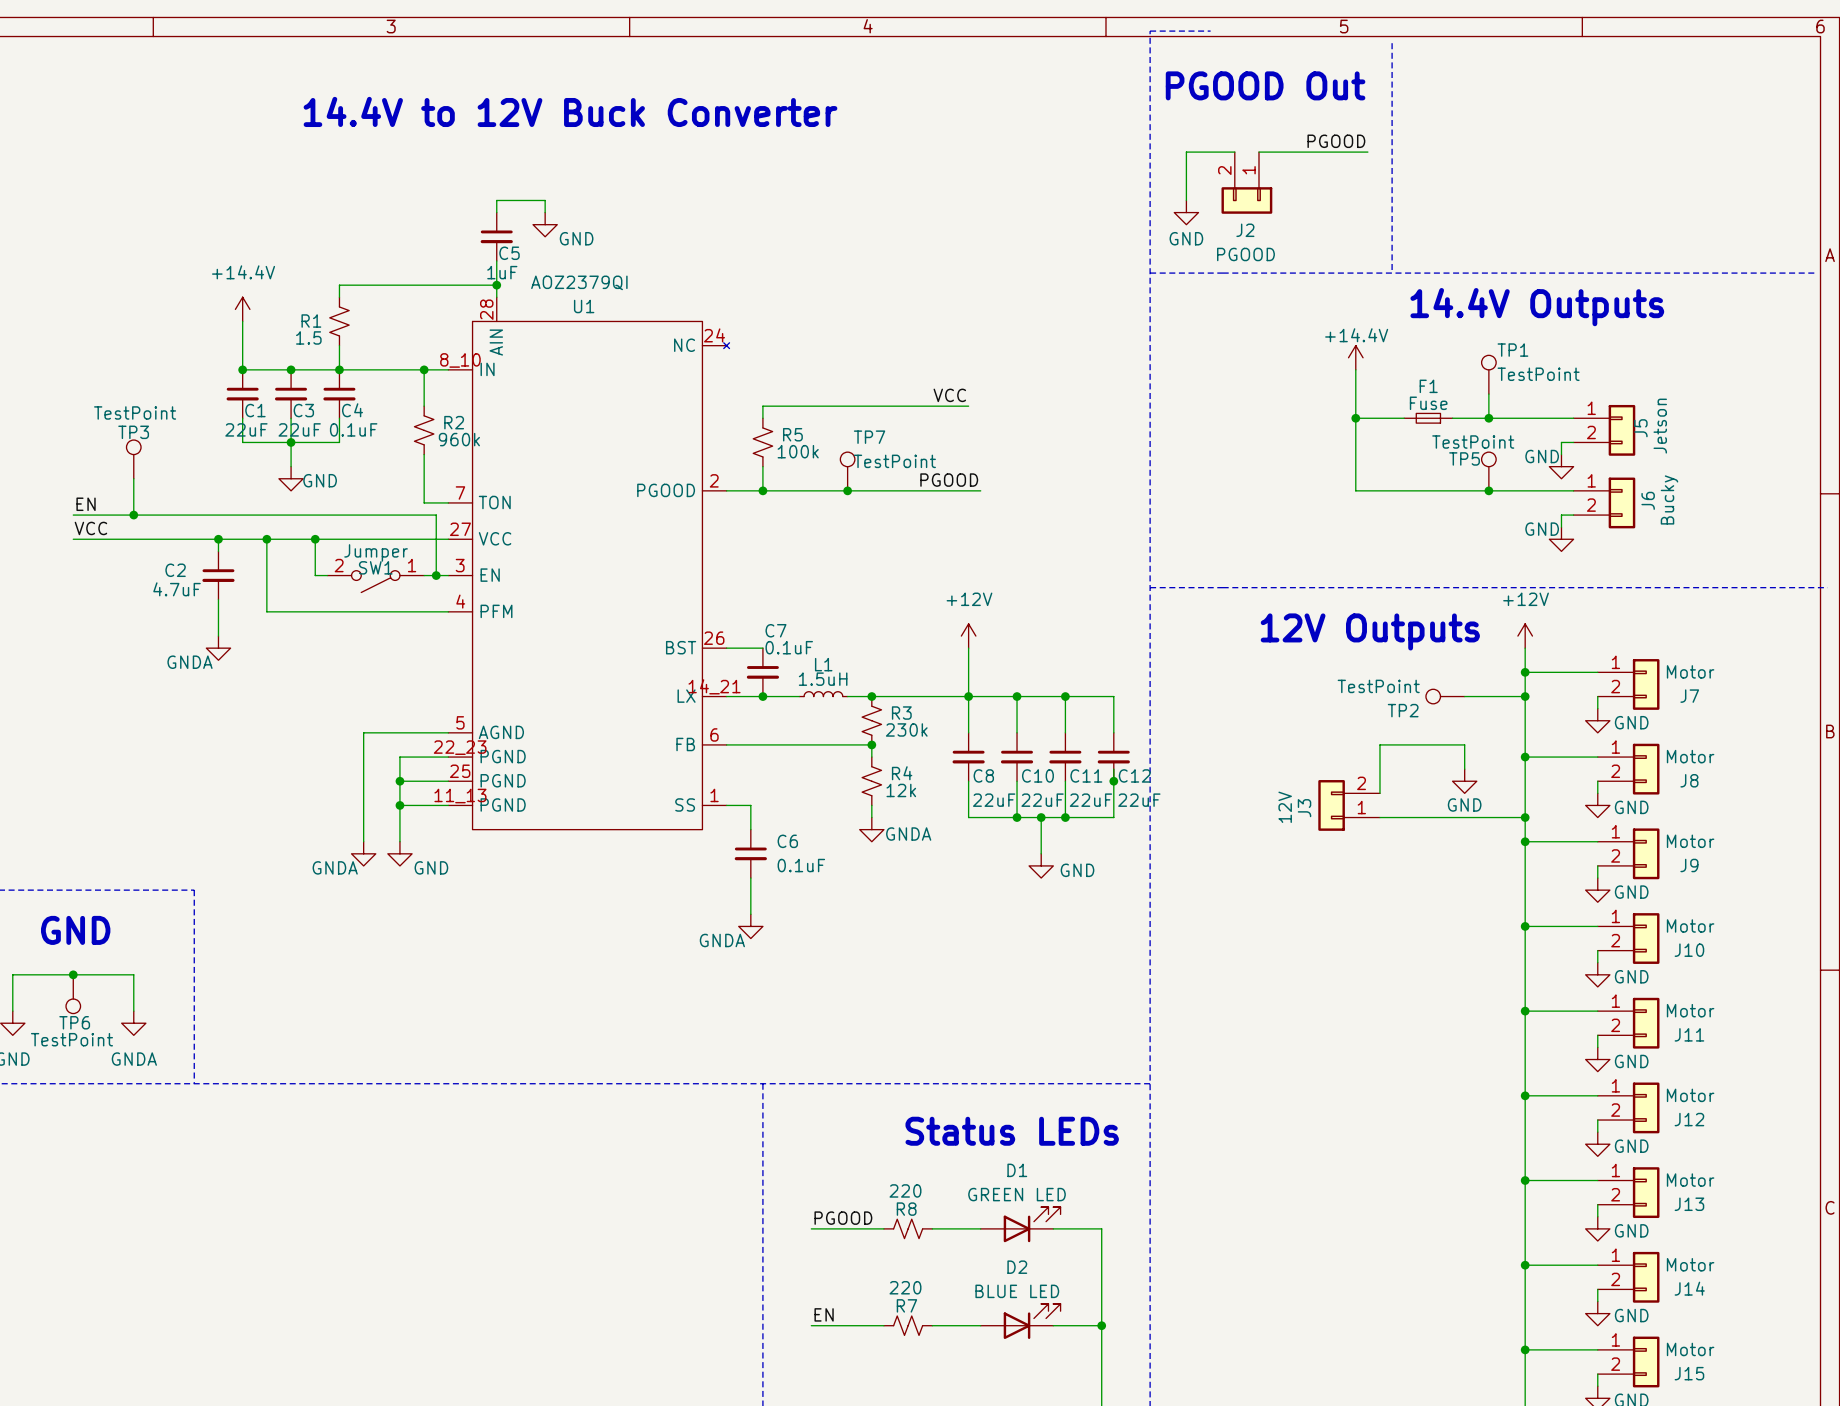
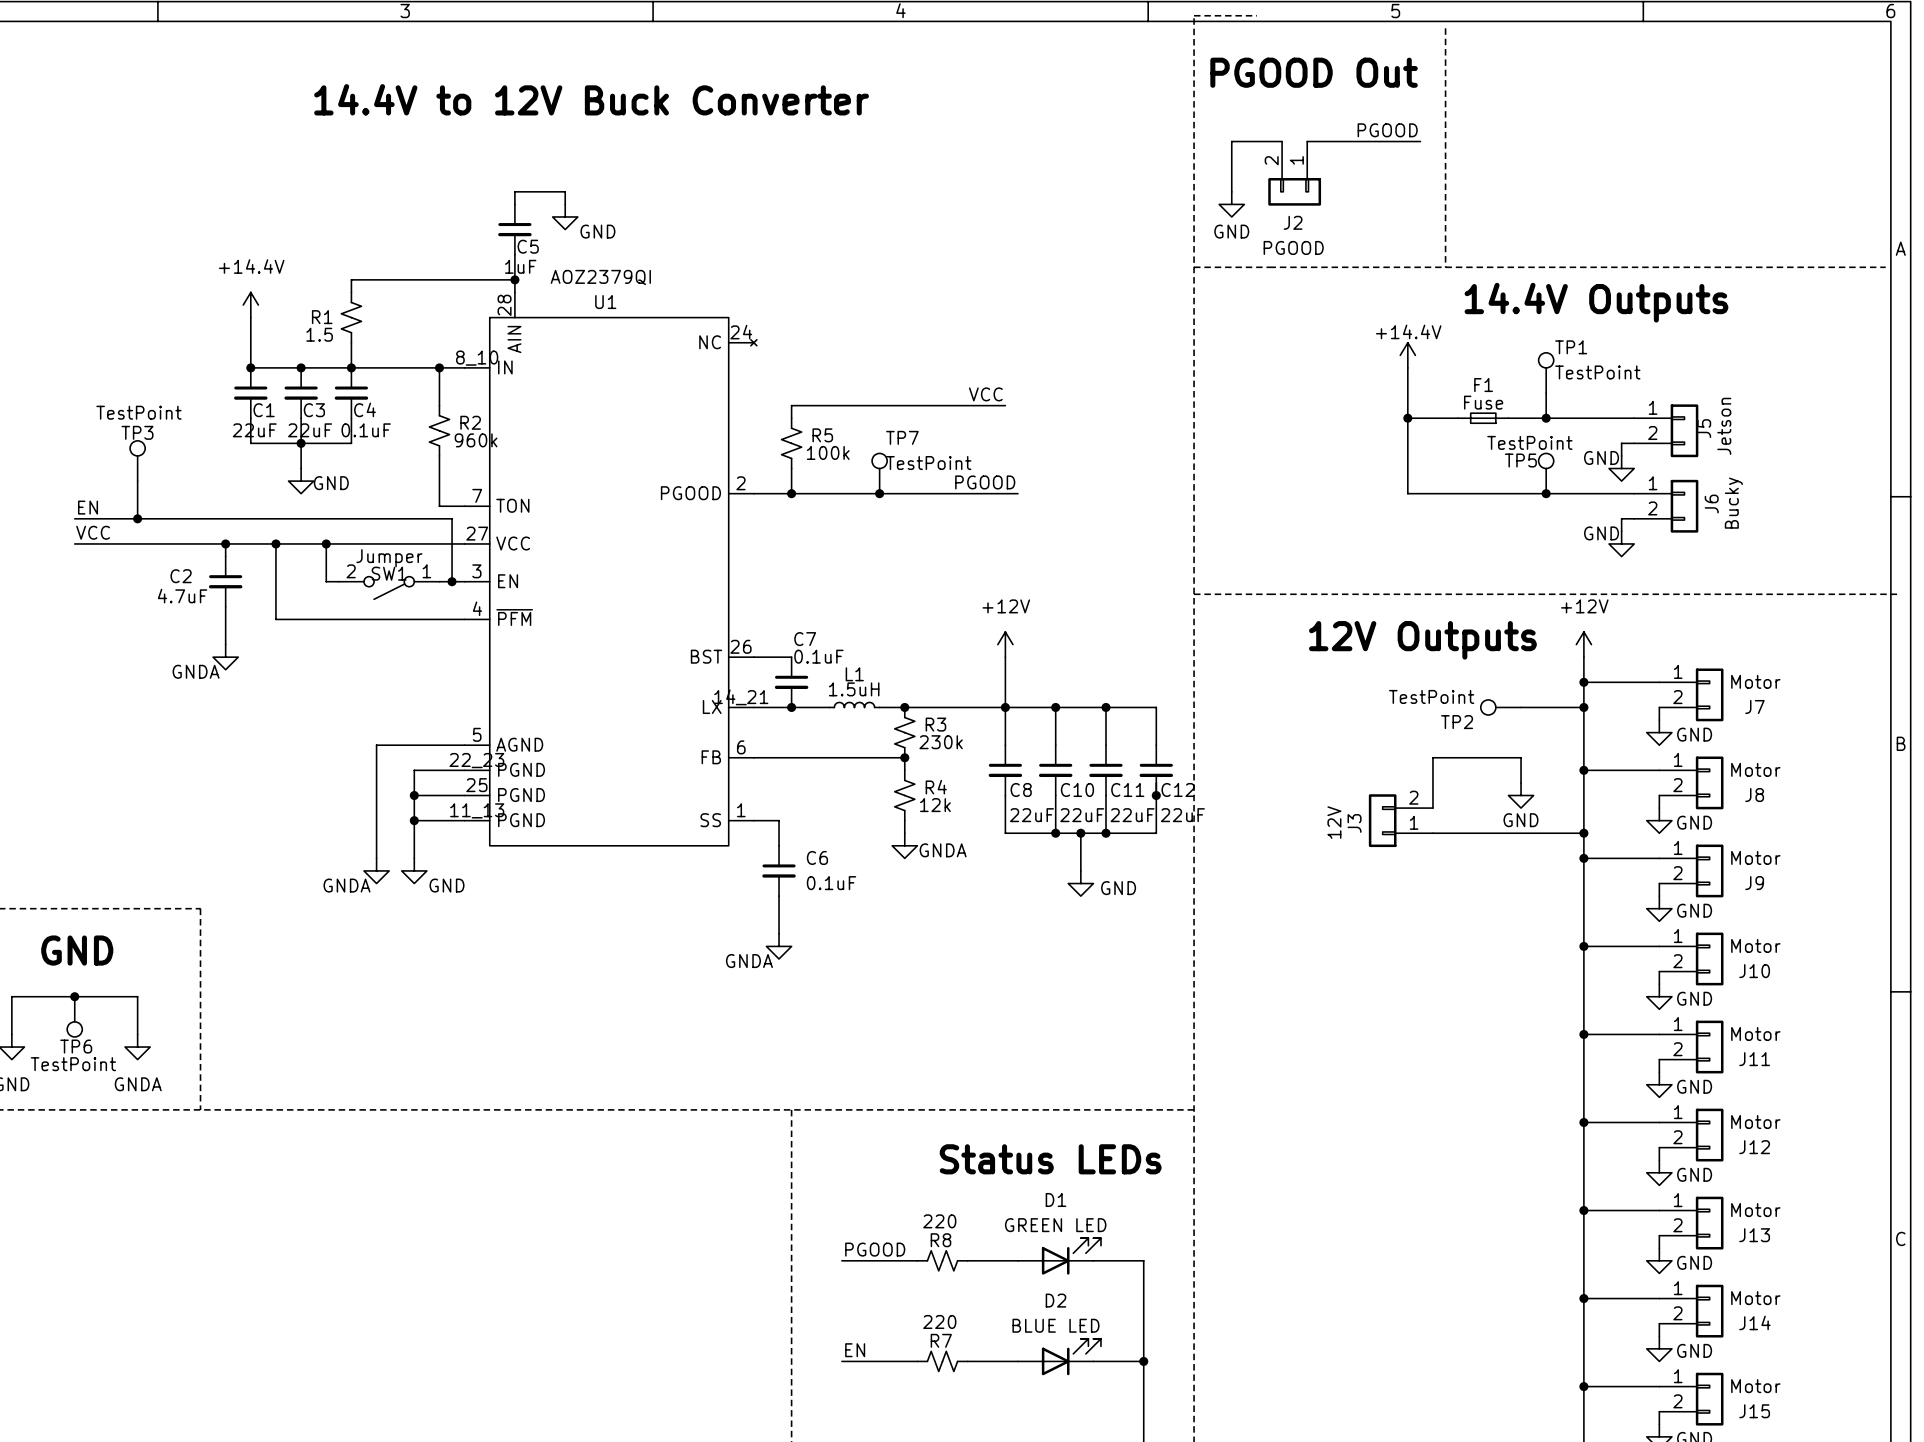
U1 pin name: PFM (496, 611) -> ~{PFM} (514, 617)

